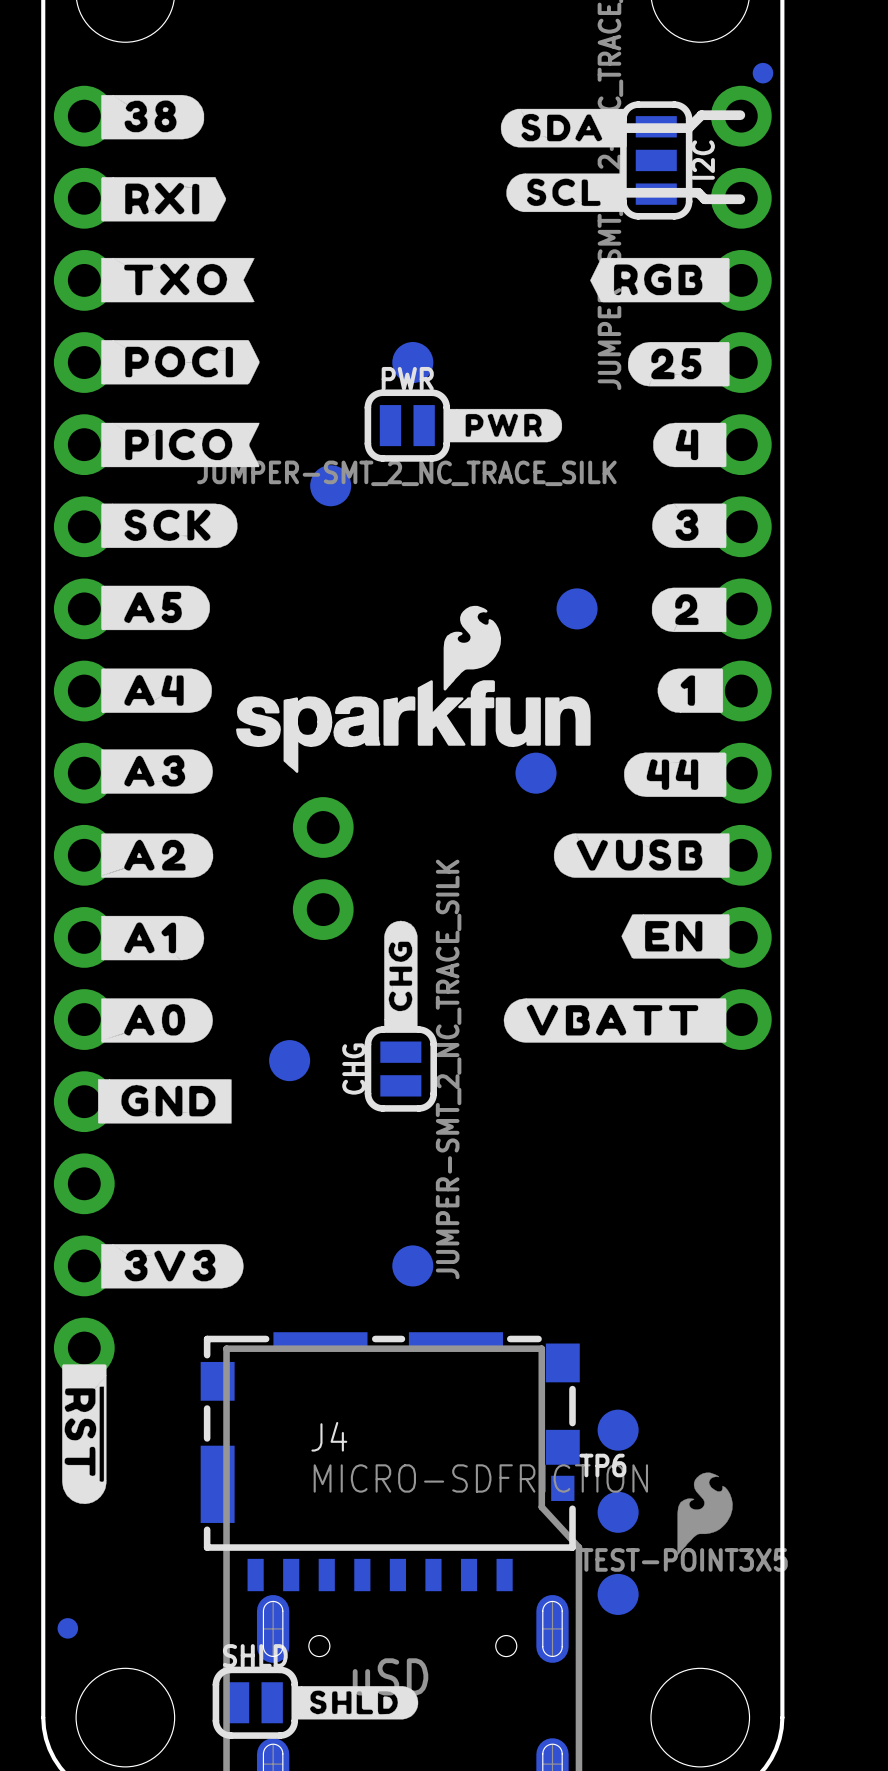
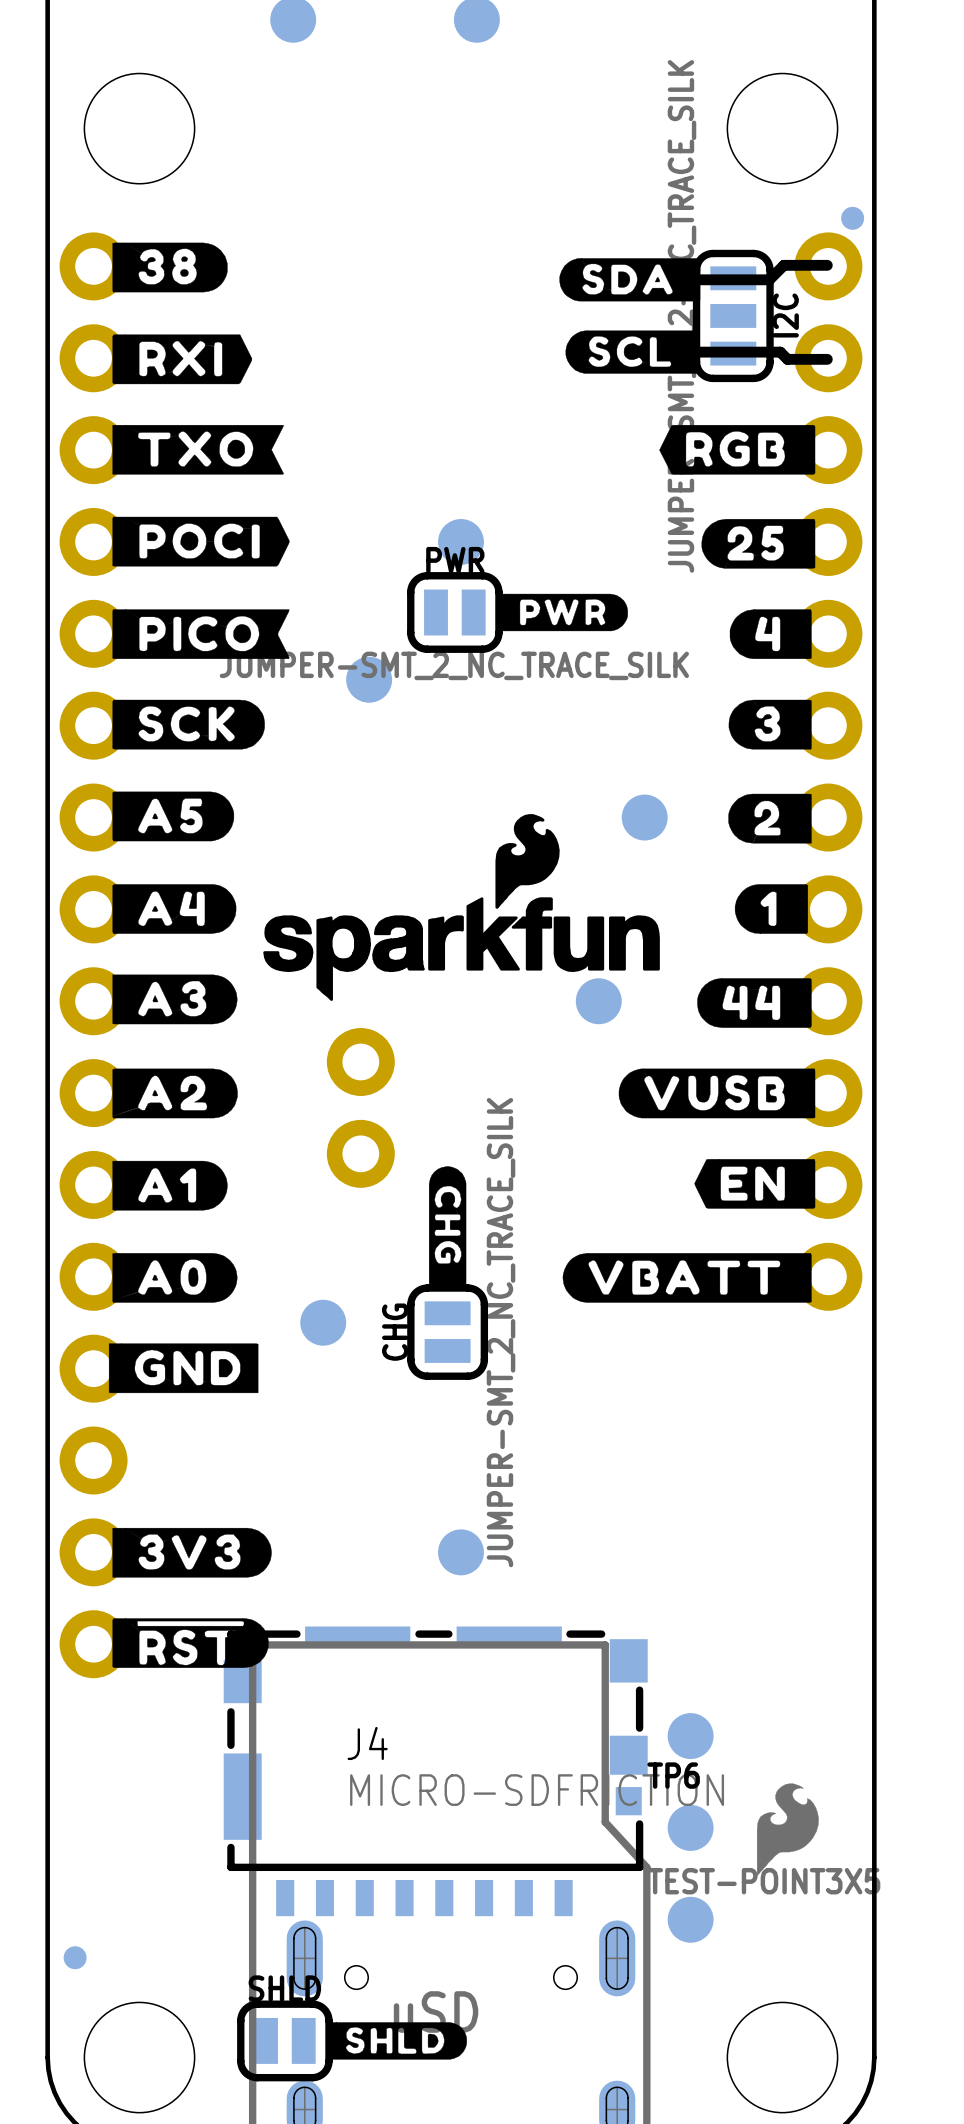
drawing shape: [384, 920, 418, 1029] -> [428, 1166, 467, 1288]
drawing: none -> [112, 1618, 269, 1668]
drawing: [62, 1364, 107, 1505] -> none

